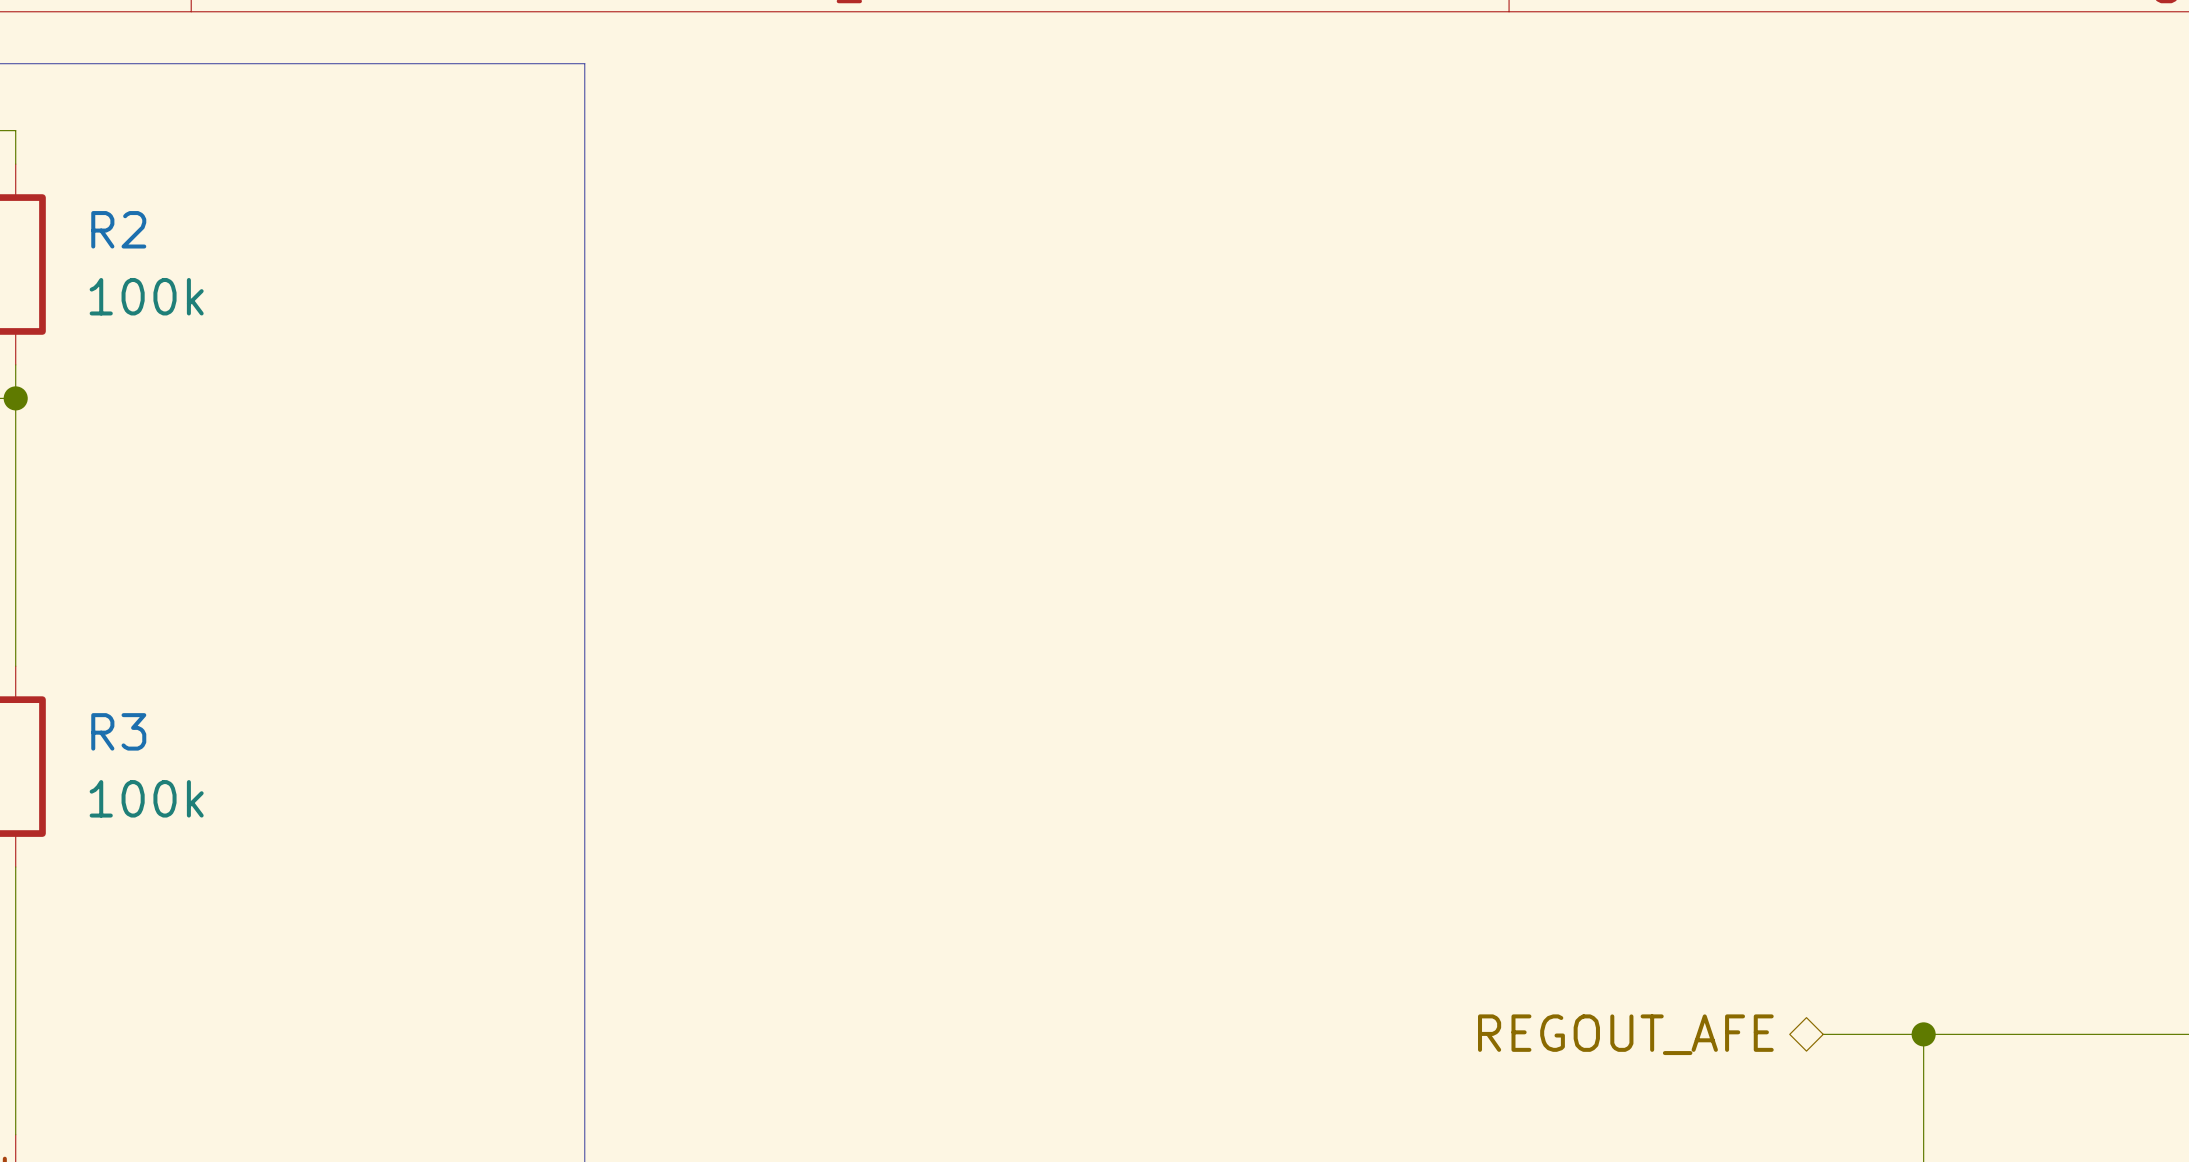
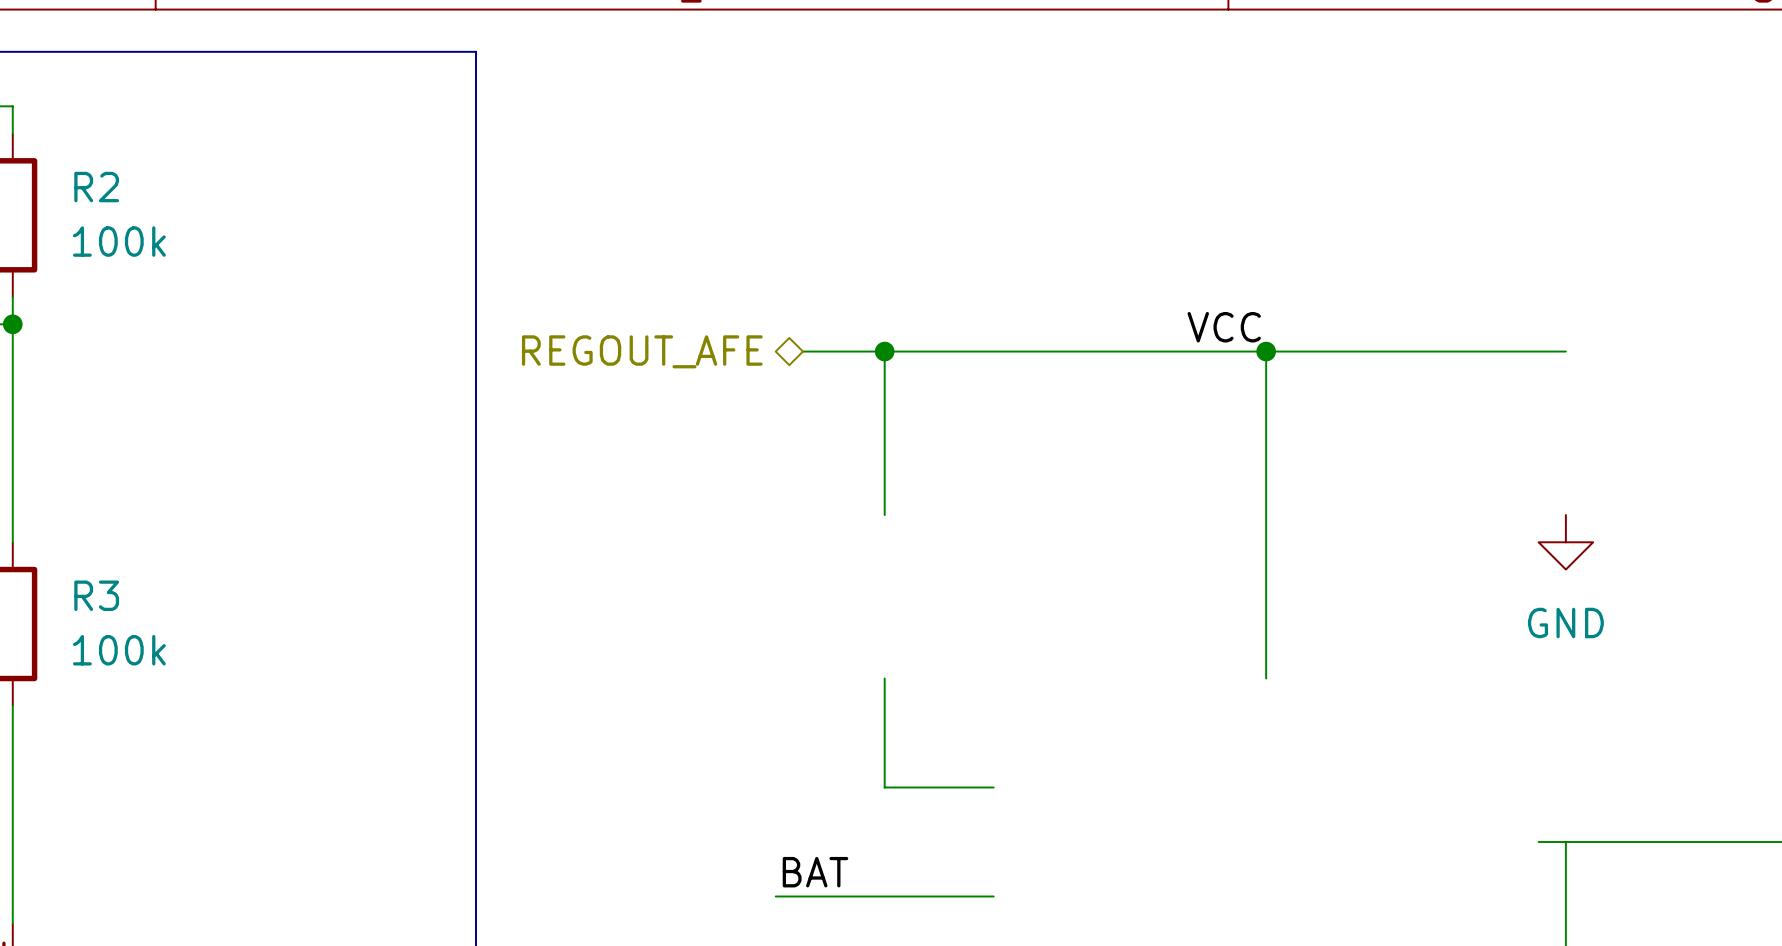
label: none -> VCC (1224, 327)
wire: none -> (802, 351) (1565, 351)
wire: none -> (884, 351) (884, 515)
junction: none -> (884, 351)
wire: none -> (1266, 351) (1266, 678)
junction: none -> (1266, 351)
hierarchical label: none -> REGOUT_AFE (642, 351)
power symbol: none -> GND (1565, 542)
wire: none -> (884, 678) (884, 787) (993, 787)
hierarchical label: REGOUT_AFE (1625, 1034) -> none
wire: (1823, 1034) (1890, 1034) -> none
junction: (1923, 1034) -> none
label: none -> BAT (815, 872)
wire: none -> (775, 896) (993, 896)

